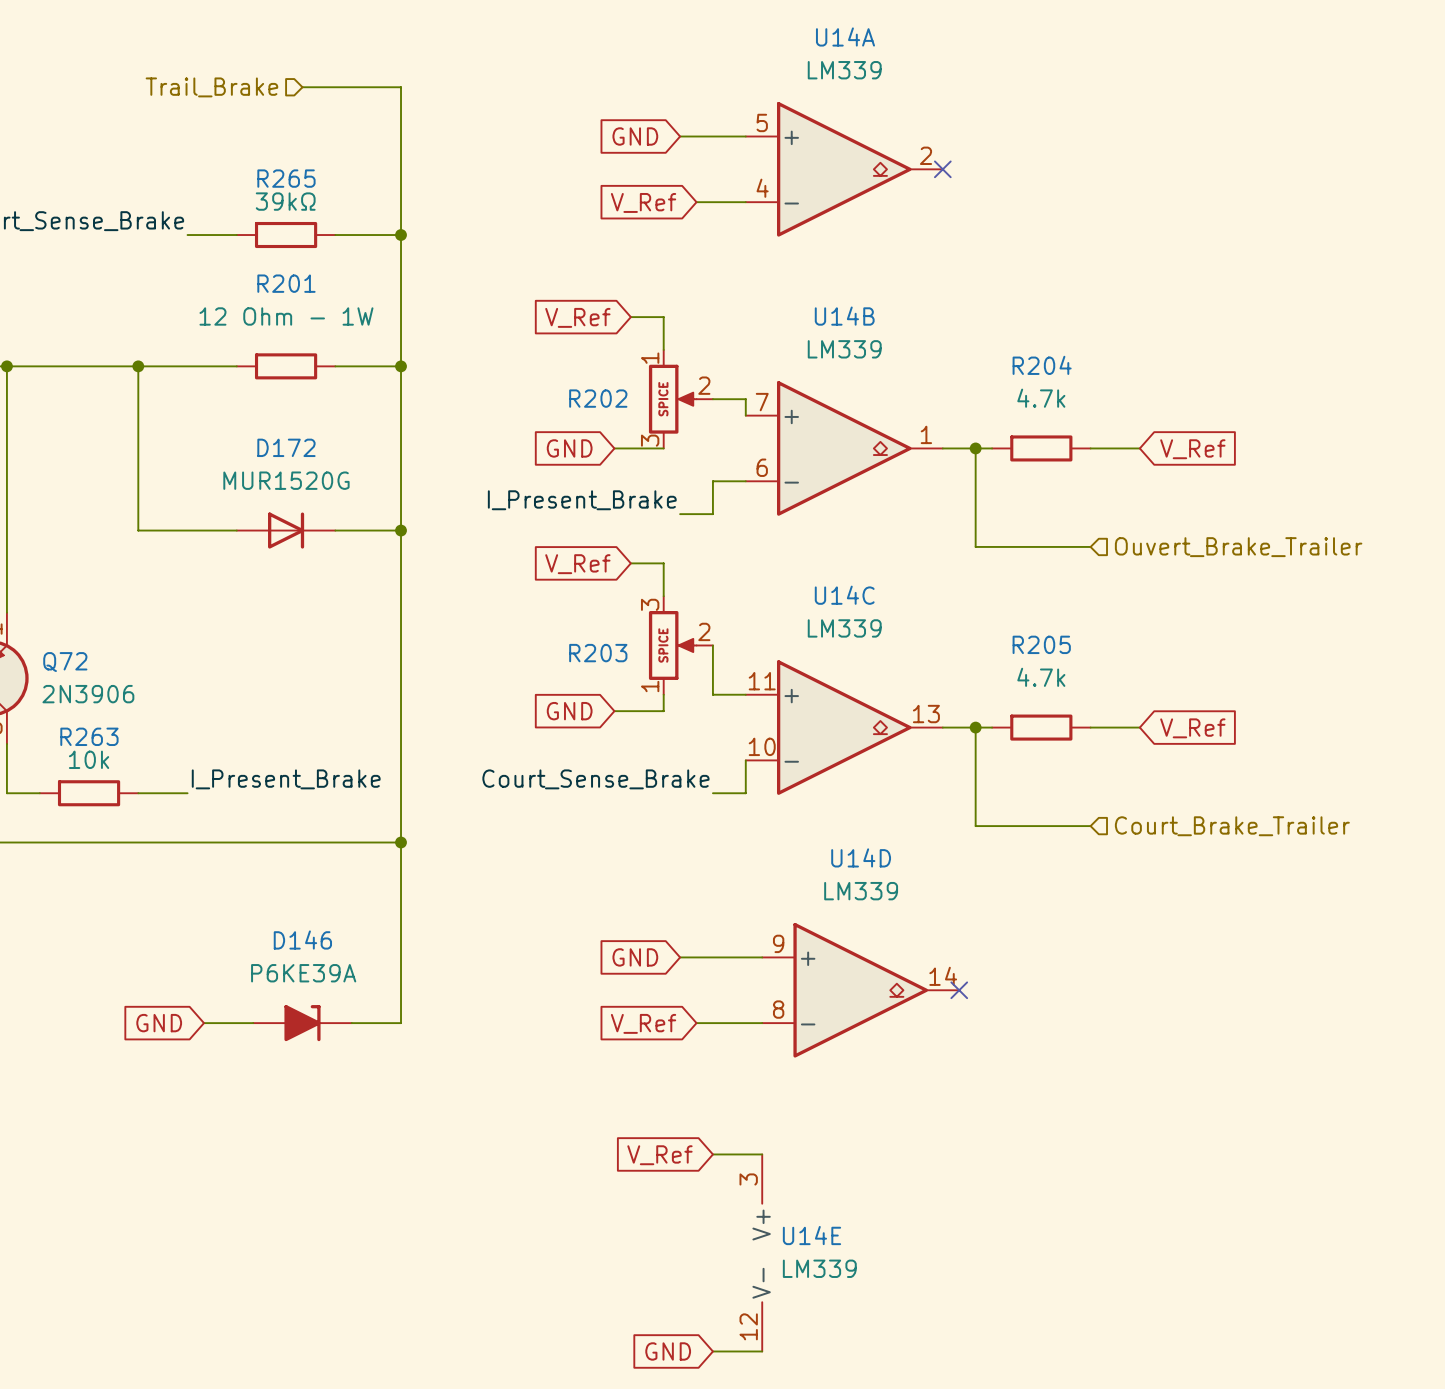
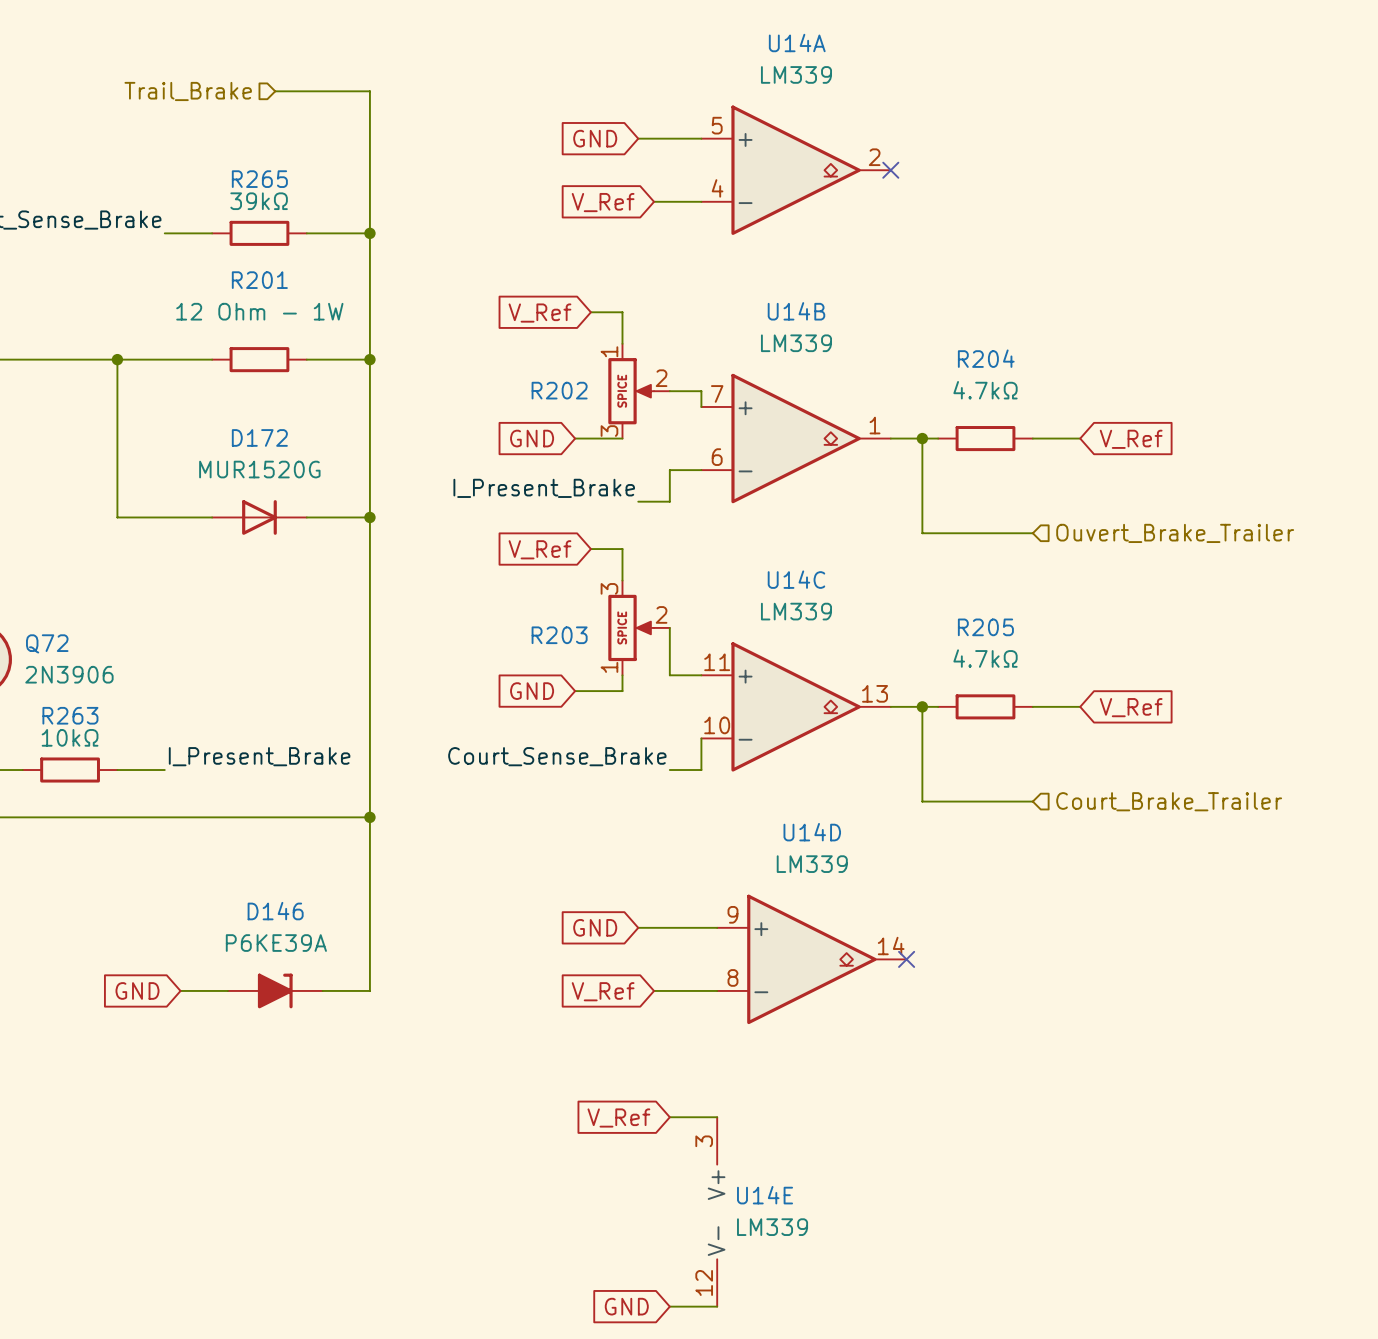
R204 value: 4.7k (1041, 398) -> 4.7kΩ (985, 390)
R205 value: 4.7k (1041, 677) -> 4.7kΩ (985, 658)
R263 value: 10k (89, 759) -> 10kΩ (70, 737)

